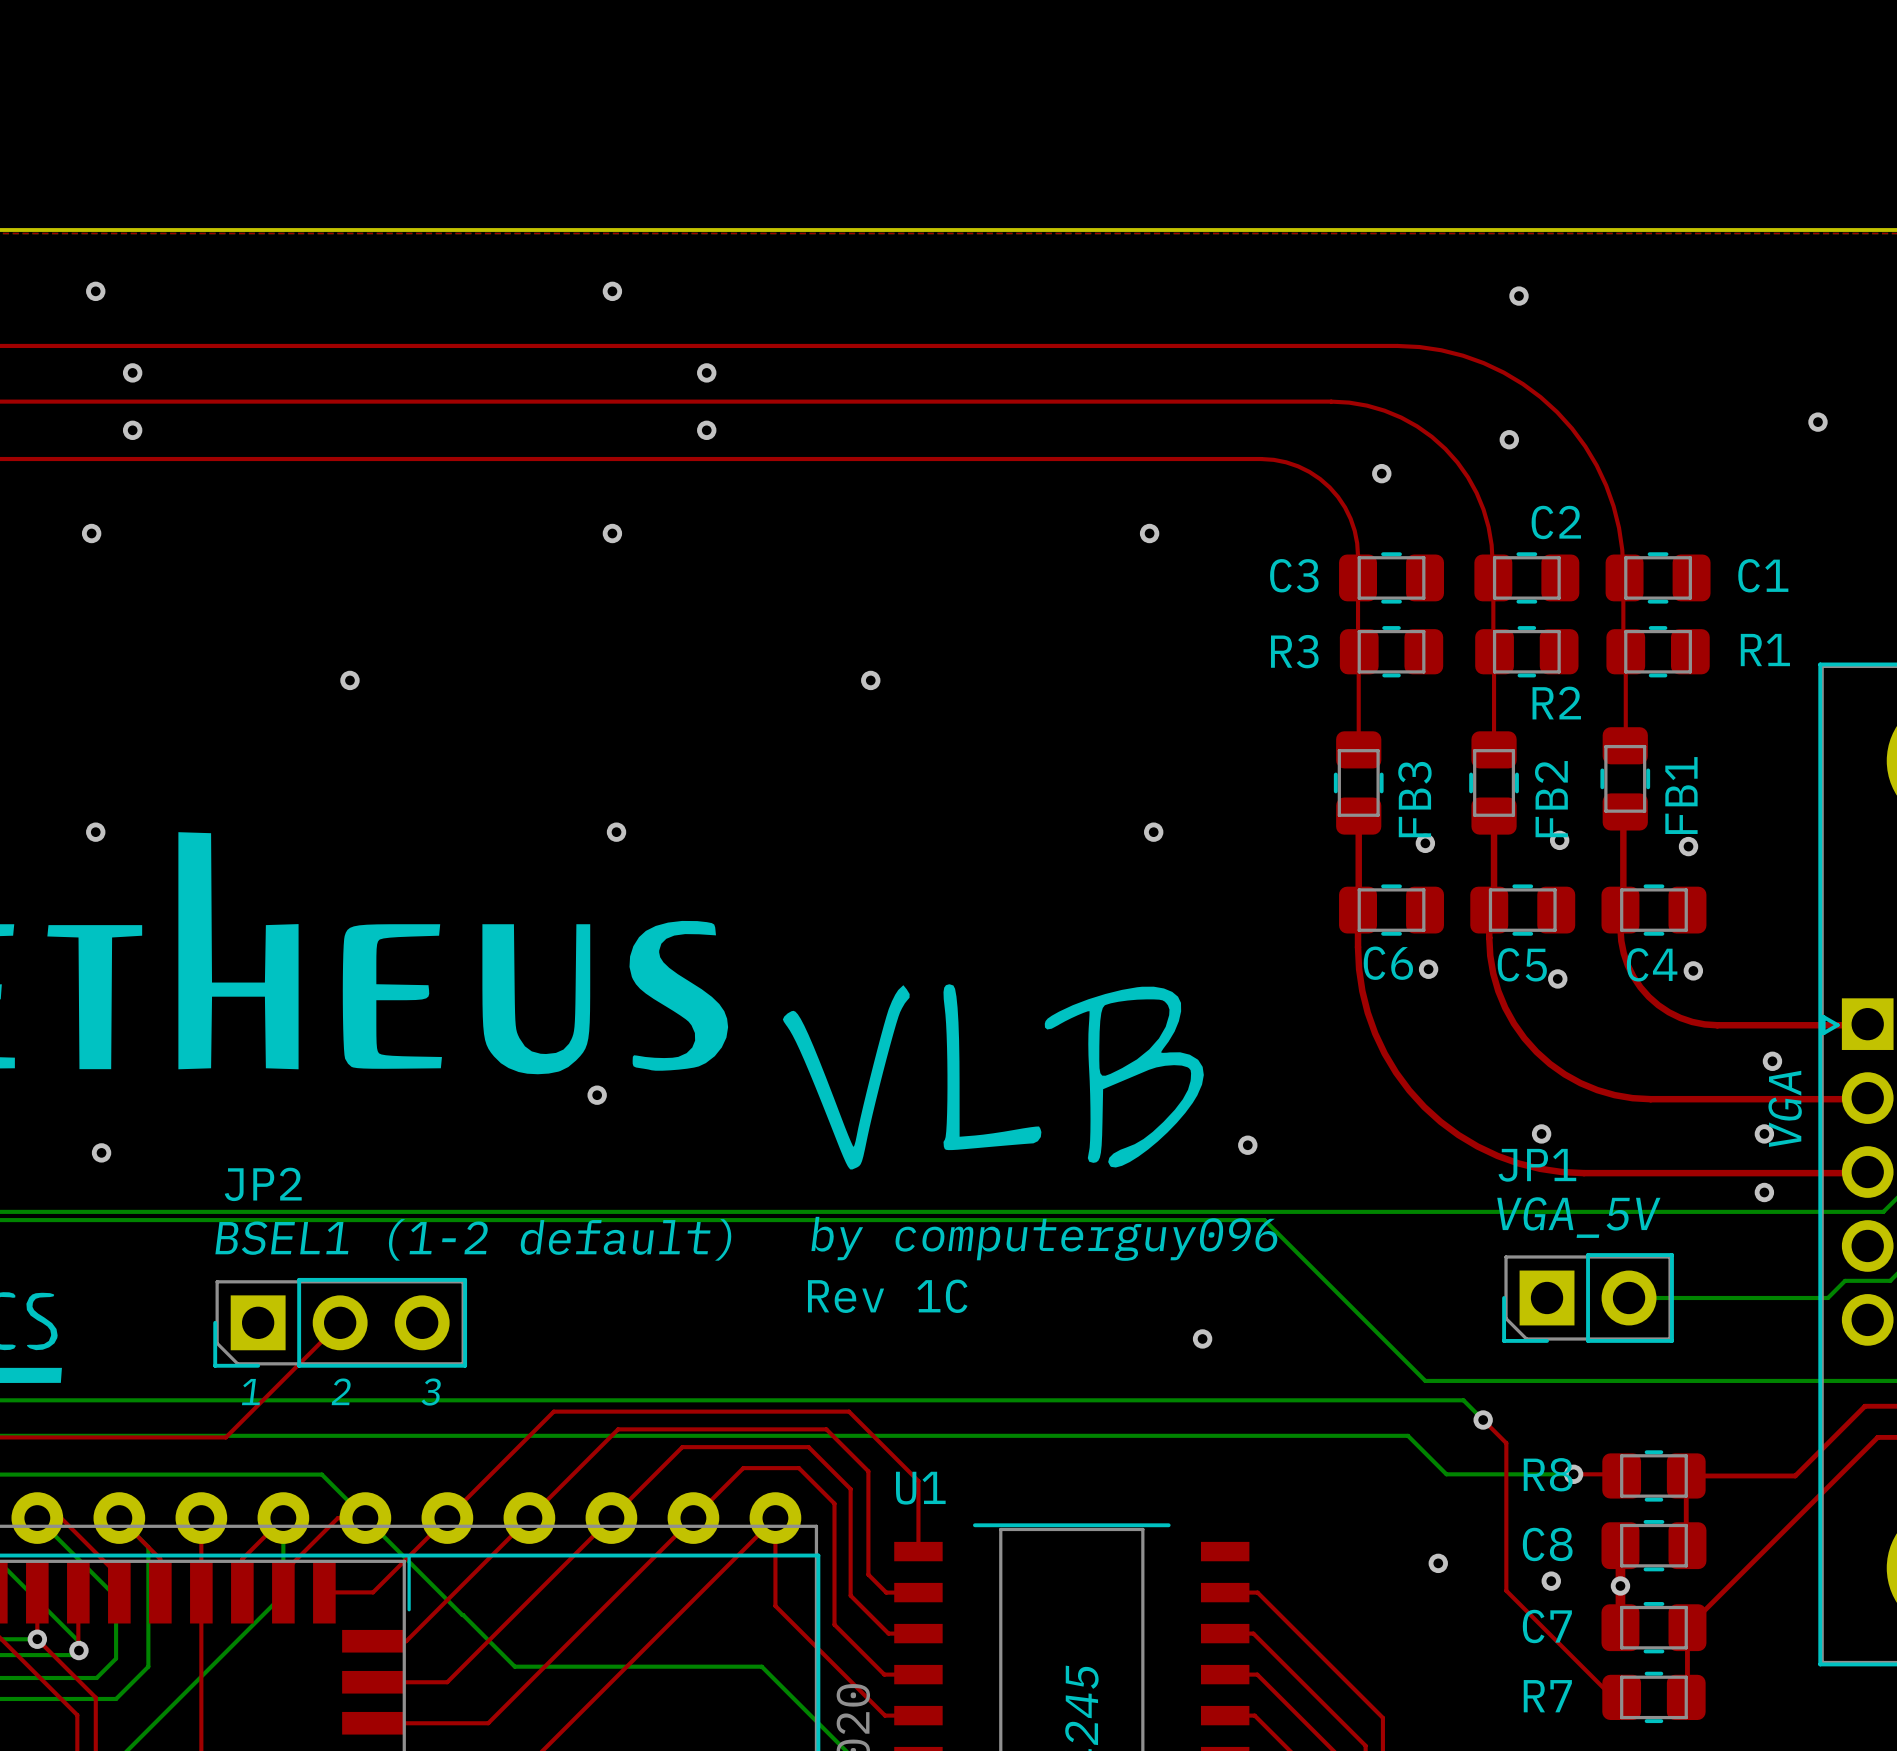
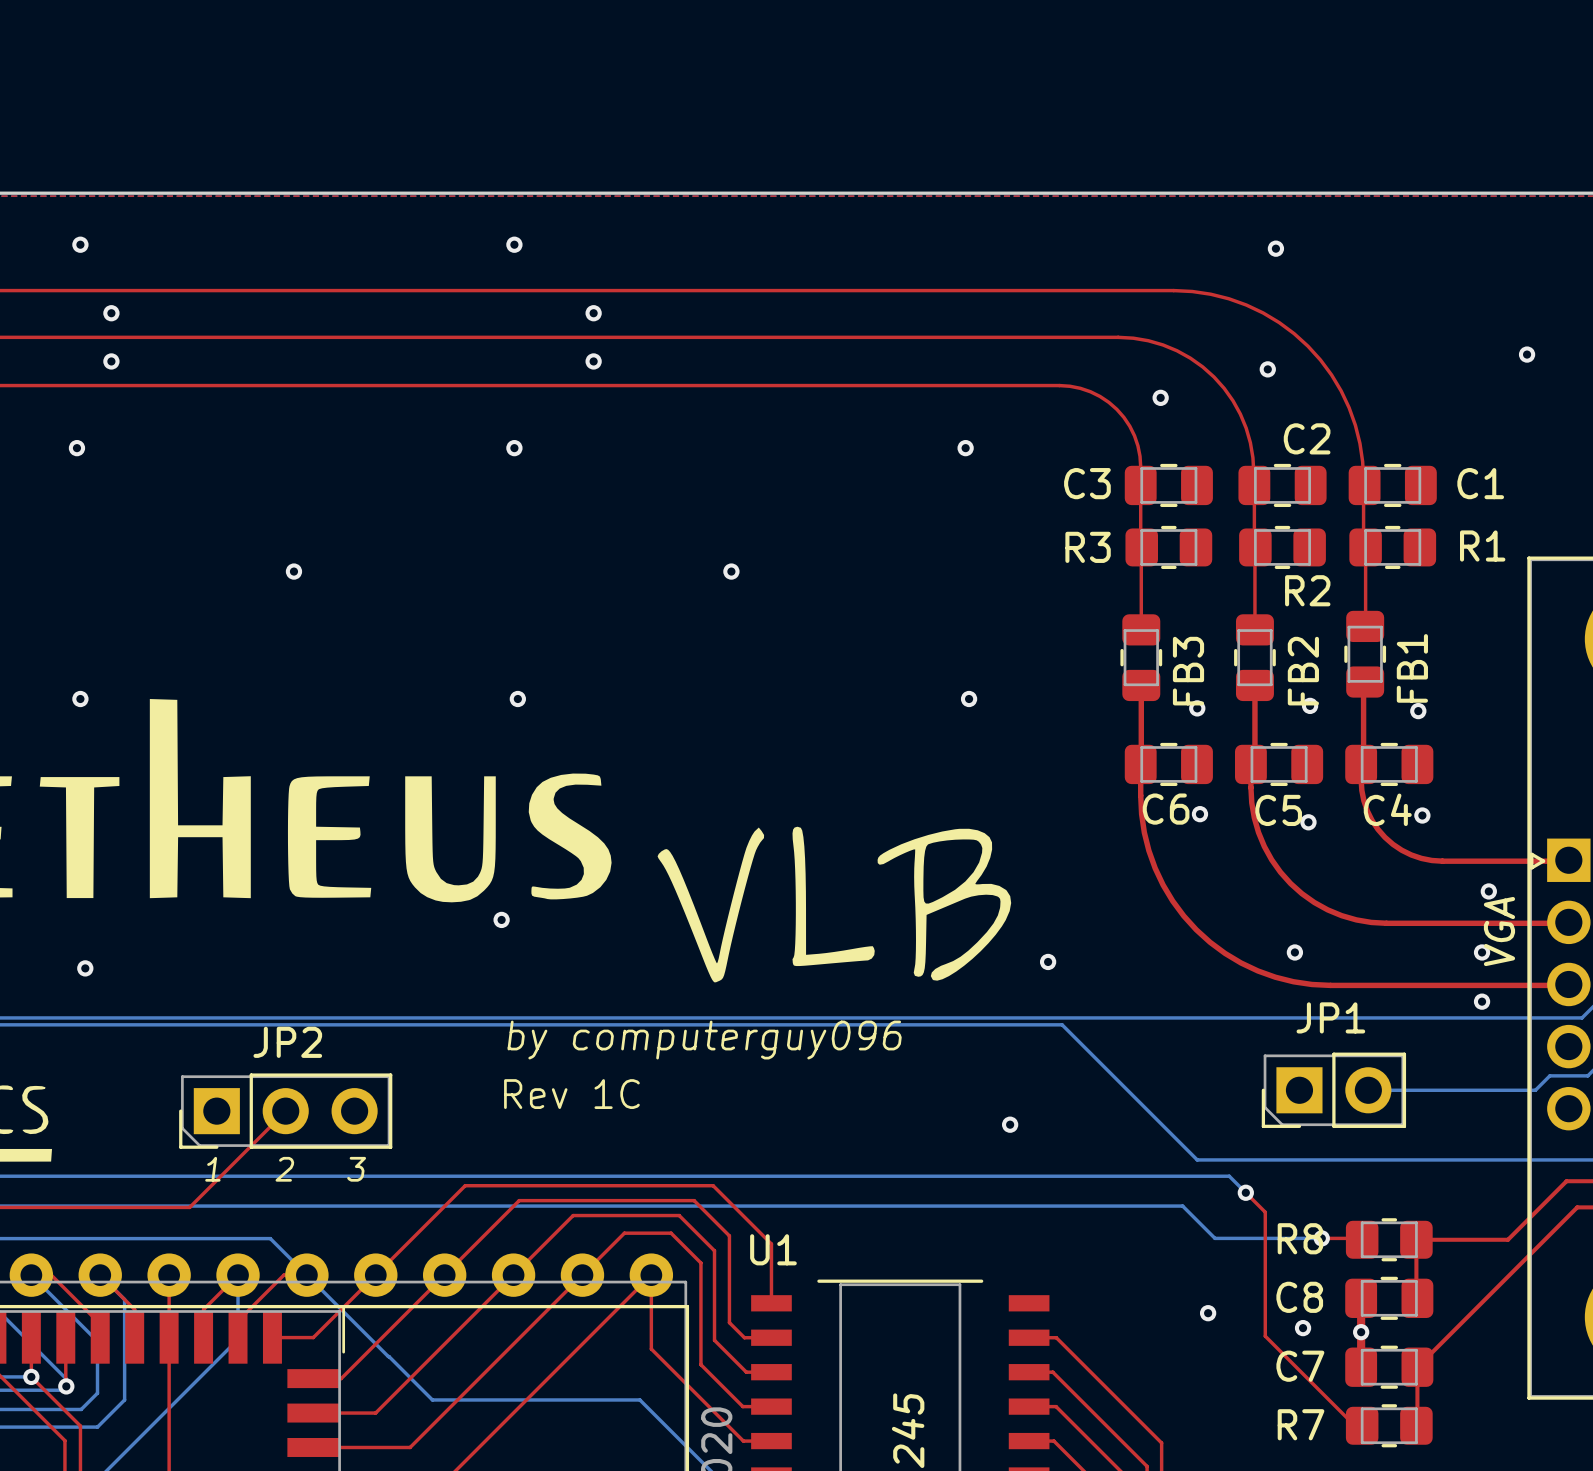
JP1 name position: JP1 (1537, 1165) -> JP1 (1330, 1017)
JP2 name position: JP2 (263, 1184) -> JP2 (287, 1042)
text: VGA_5V (1578, 1217) -> none
text position: by computerguy096 (1044, 1238) -> by computerguy096 (704, 1040)
text: BSEL1 (1-2 default) (473, 1239) -> none
text position: Rev 1C (887, 1296) -> Rev 1C (571, 1094)

